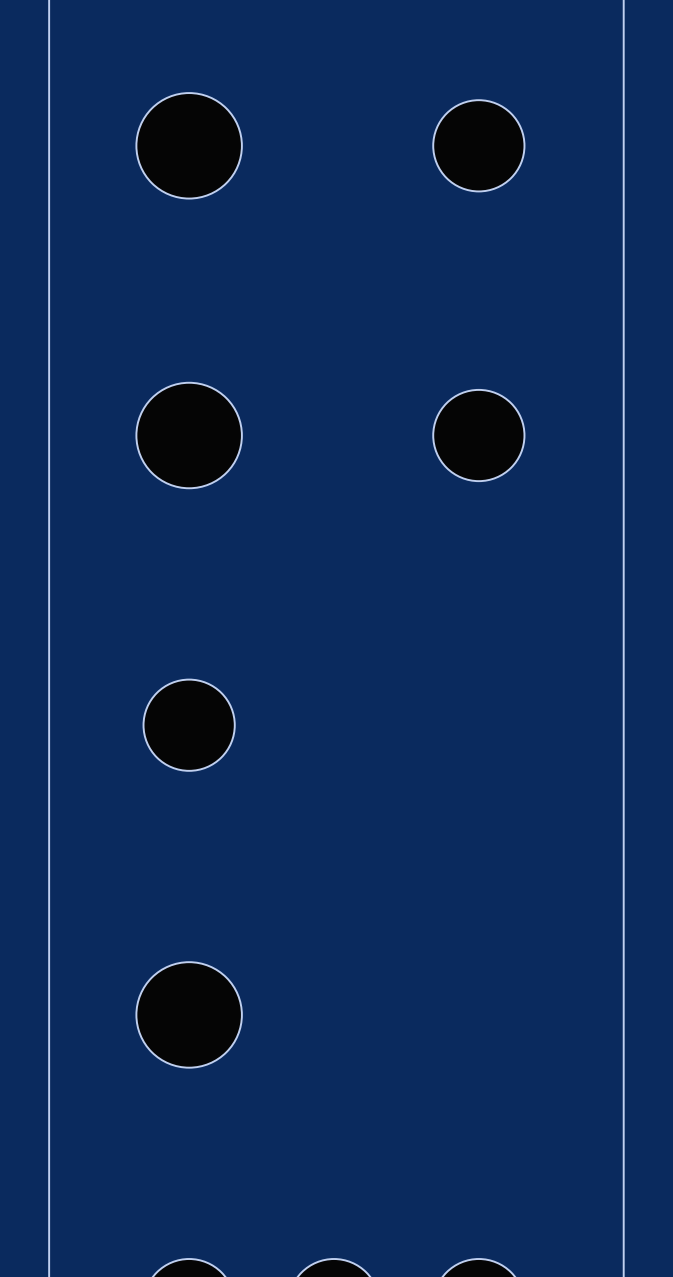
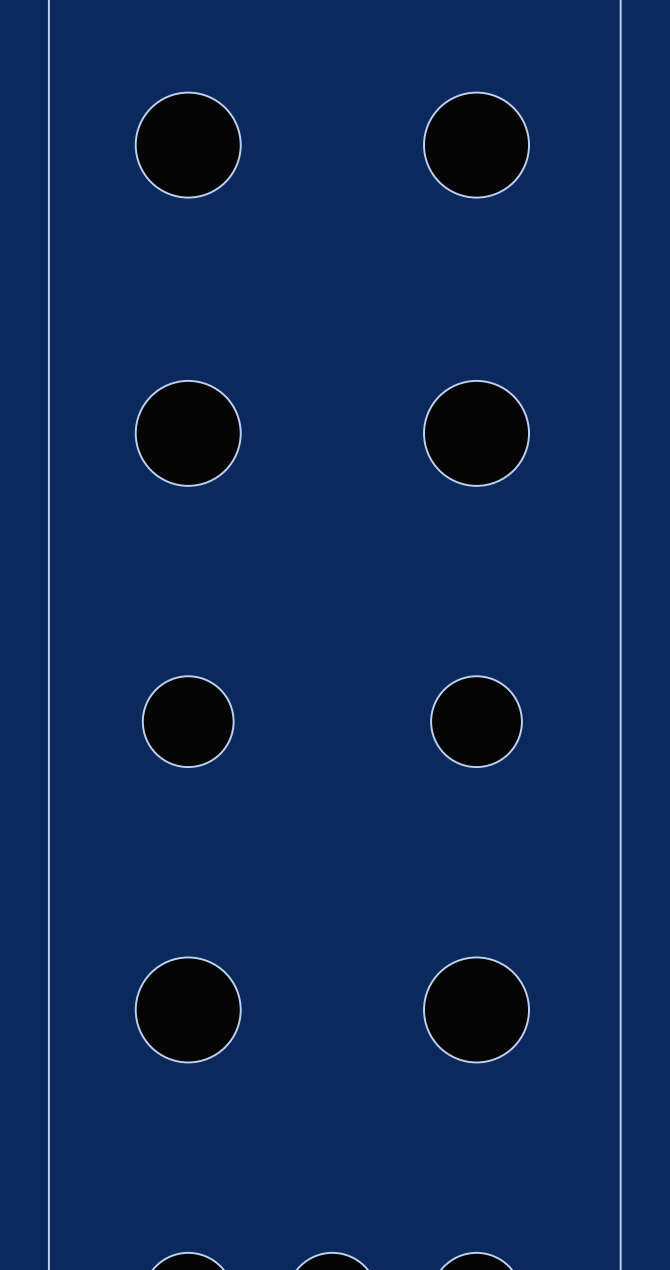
part footprint: [433, 100, 525, 192] -> [424, 92, 530, 198]
part footprint: [433, 389, 525, 482] -> [424, 380, 530, 486]
part: none -> (476, 721)
part: none -> (476, 1009)

